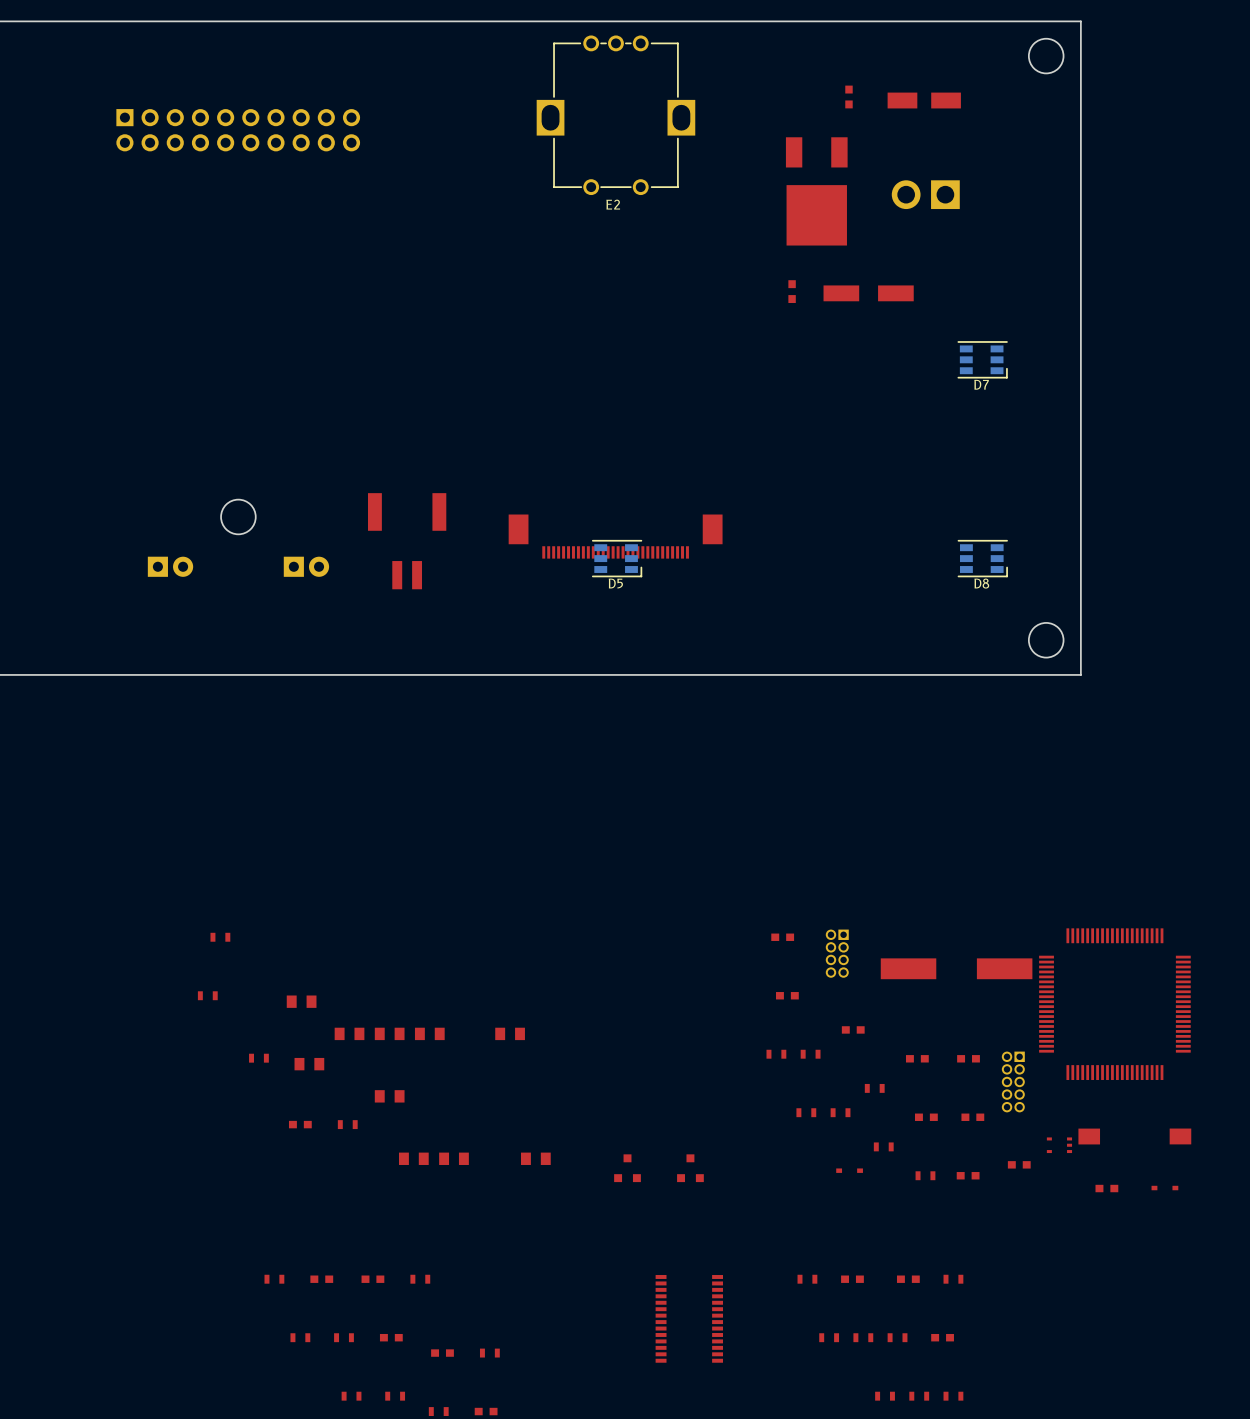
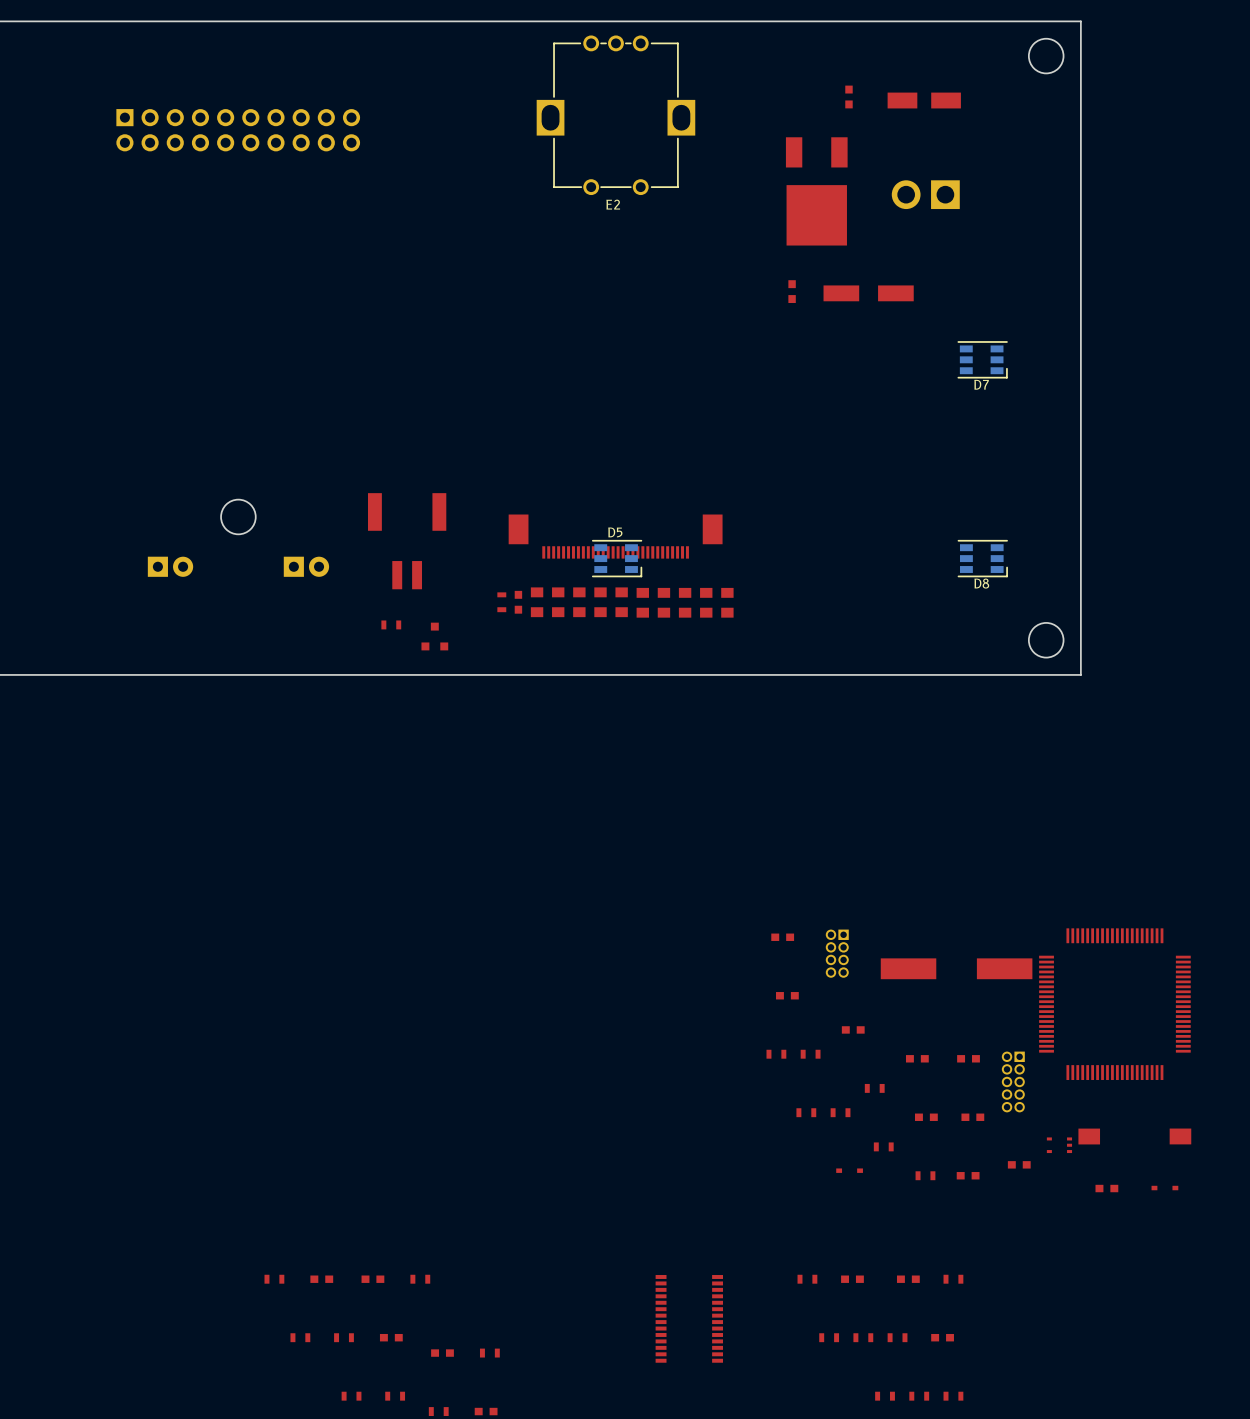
D5 name position: D5 (615, 583) -> D5 (615, 532)
part: none -> (501, 602)
part: none -> (518, 602)
part: none -> (537, 602)
part: none -> (558, 602)
part: none -> (579, 602)
part: none -> (600, 602)
part: none -> (621, 602)
part: none -> (642, 602)
part: none -> (663, 602)
part: none -> (685, 602)
part: none -> (706, 602)
part: none -> (727, 602)
part: none -> (391, 624)
part: none -> (434, 636)
part: (220, 937) -> none
part: (207, 995) -> none
part: (301, 1001) -> none
part: (349, 1033) -> none
part: (389, 1033) -> none
part: (429, 1033) -> none
part: (510, 1033) -> none
part: (258, 1058) -> none
part: (309, 1064) -> none
part: (389, 1096) -> none
part: (300, 1124) -> none
part: (347, 1124) -> none
part: (413, 1158) -> none
part: (454, 1158) -> none
part: (535, 1158) -> none
part: (627, 1168) -> none
part: (690, 1168) -> none

